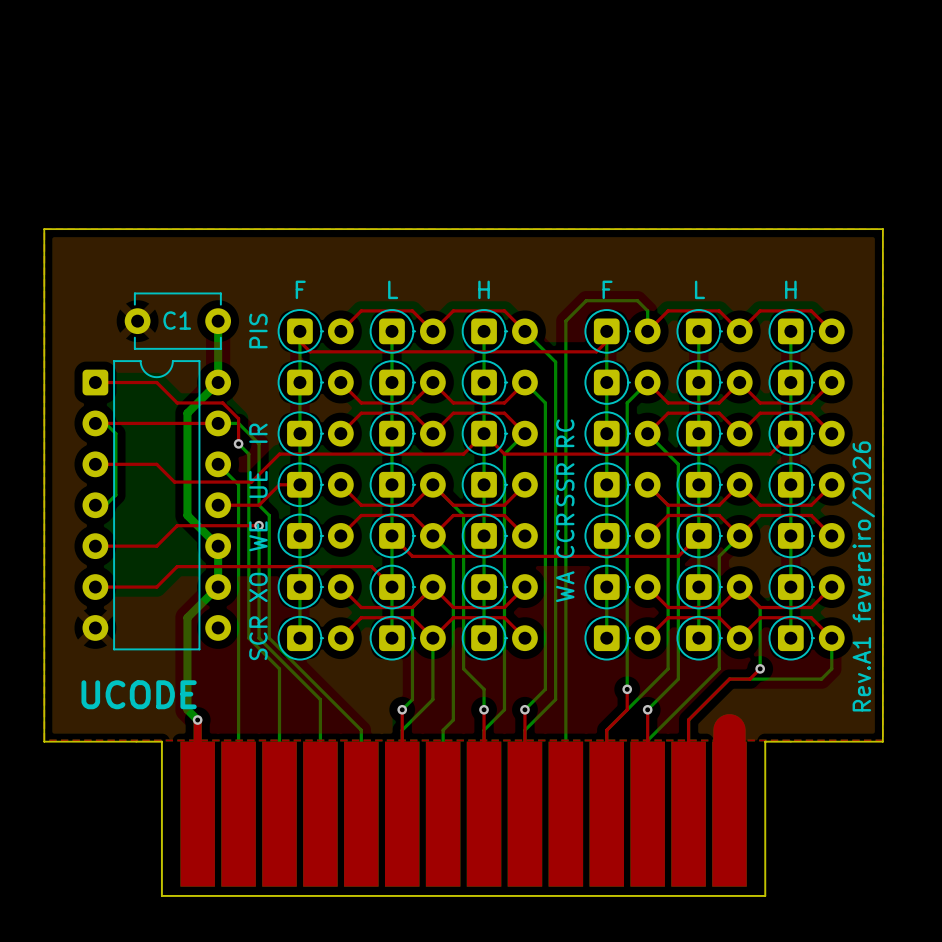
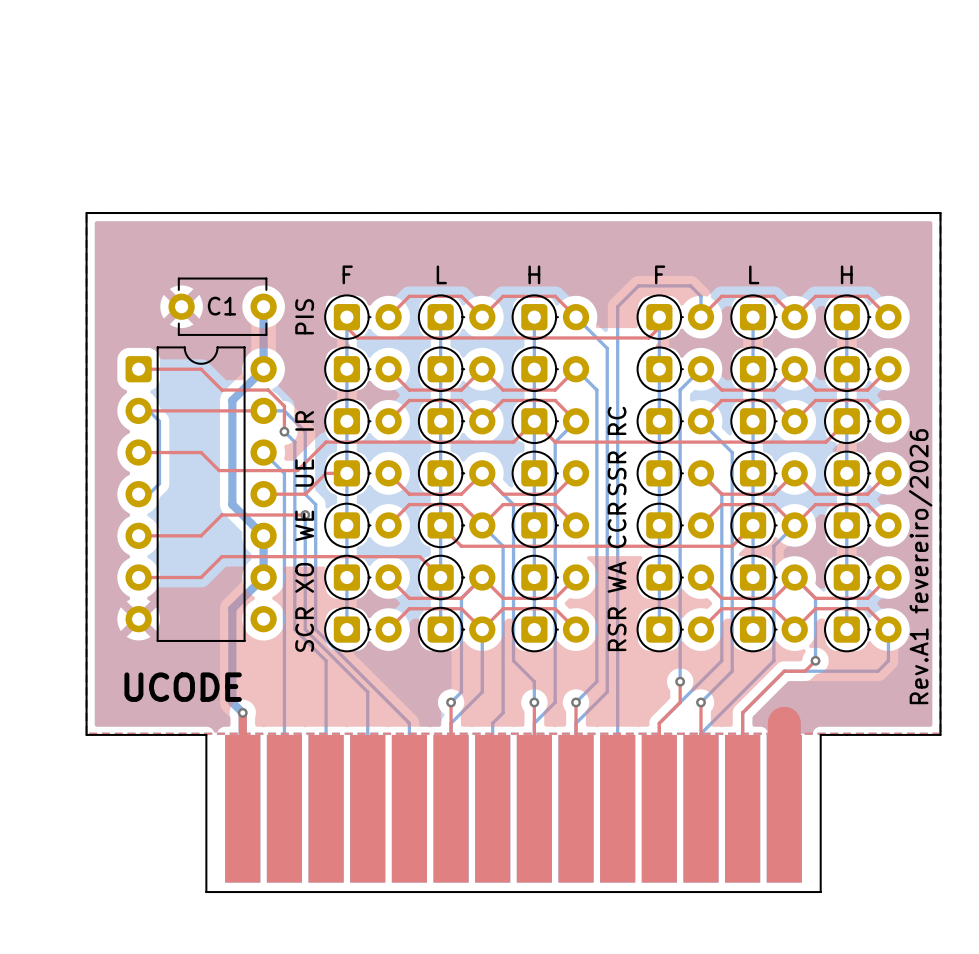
text: none -> RSR (617, 629)

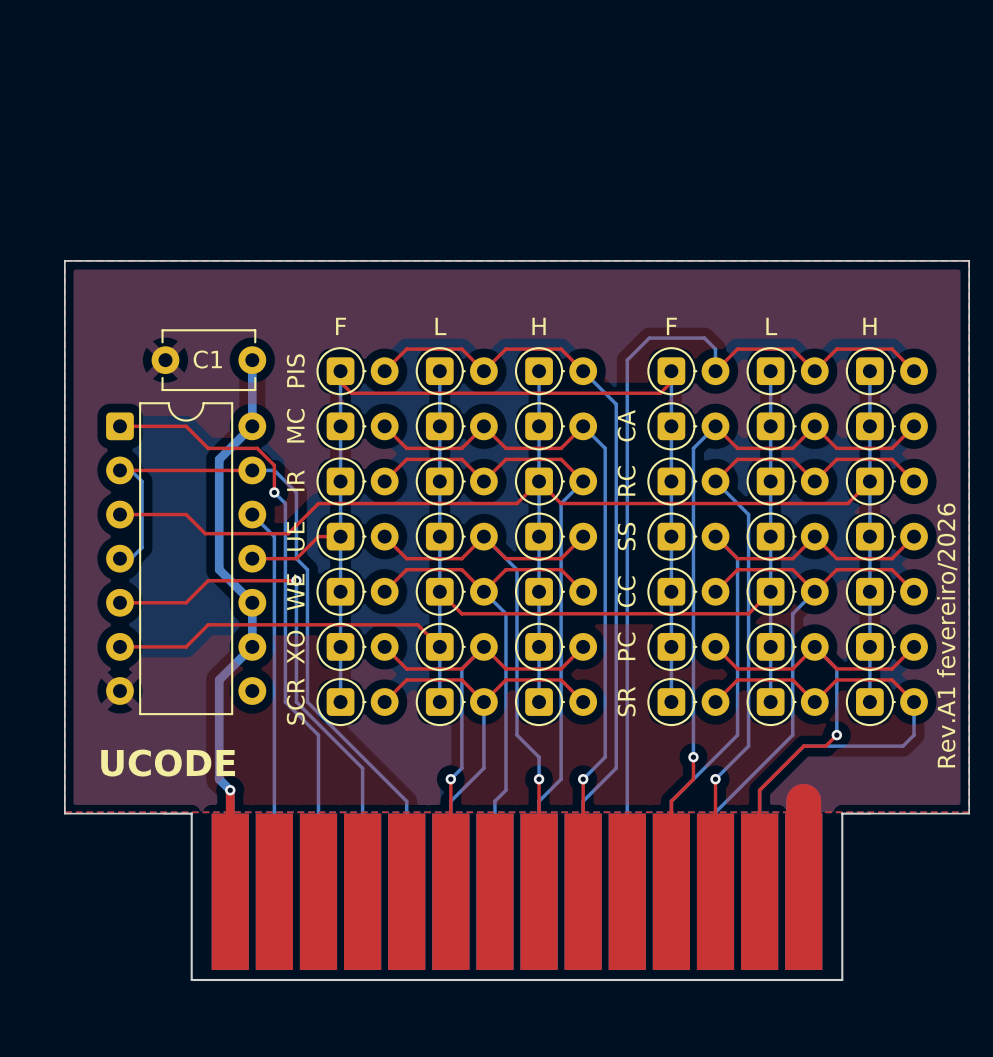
text: none -> MC (295, 425)
text: none -> CA (626, 425)
text: SSR (617, 473) -> SS (626, 536)
text: CCR (617, 525) -> CC (626, 591)
text: WA (617, 577) -> PC (626, 646)
text: RSR (617, 629) -> SR (626, 701)

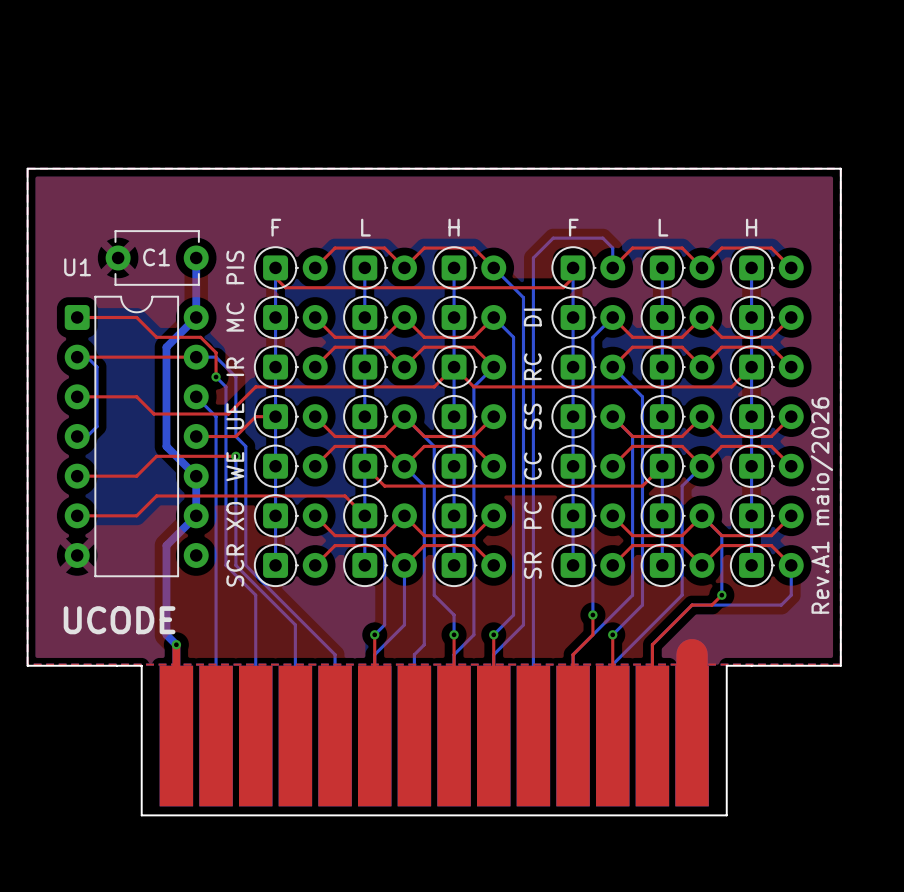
U1 name: none -> U1 (77, 267)
text: CA (626, 425) -> DI (532, 317)
text: Rev.A1 fevereiro/2026 (947, 635) -> Rev.A1 maio/2026 (821, 505)

